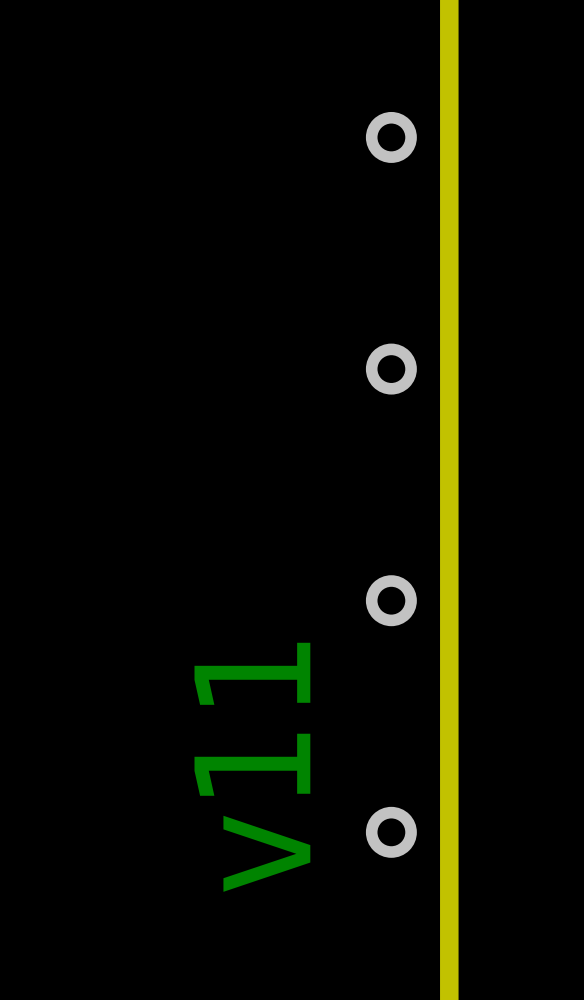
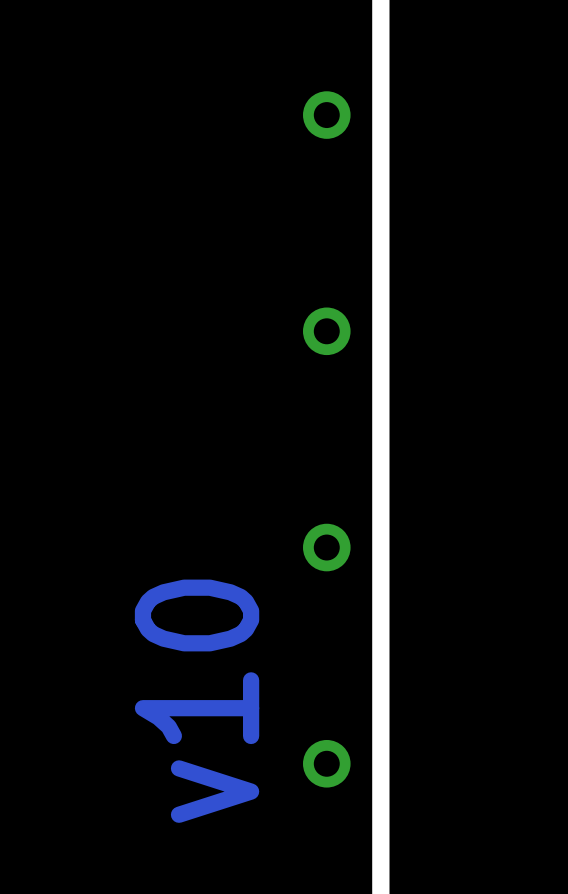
text: v11 (252, 767) -> v10 (197, 701)

